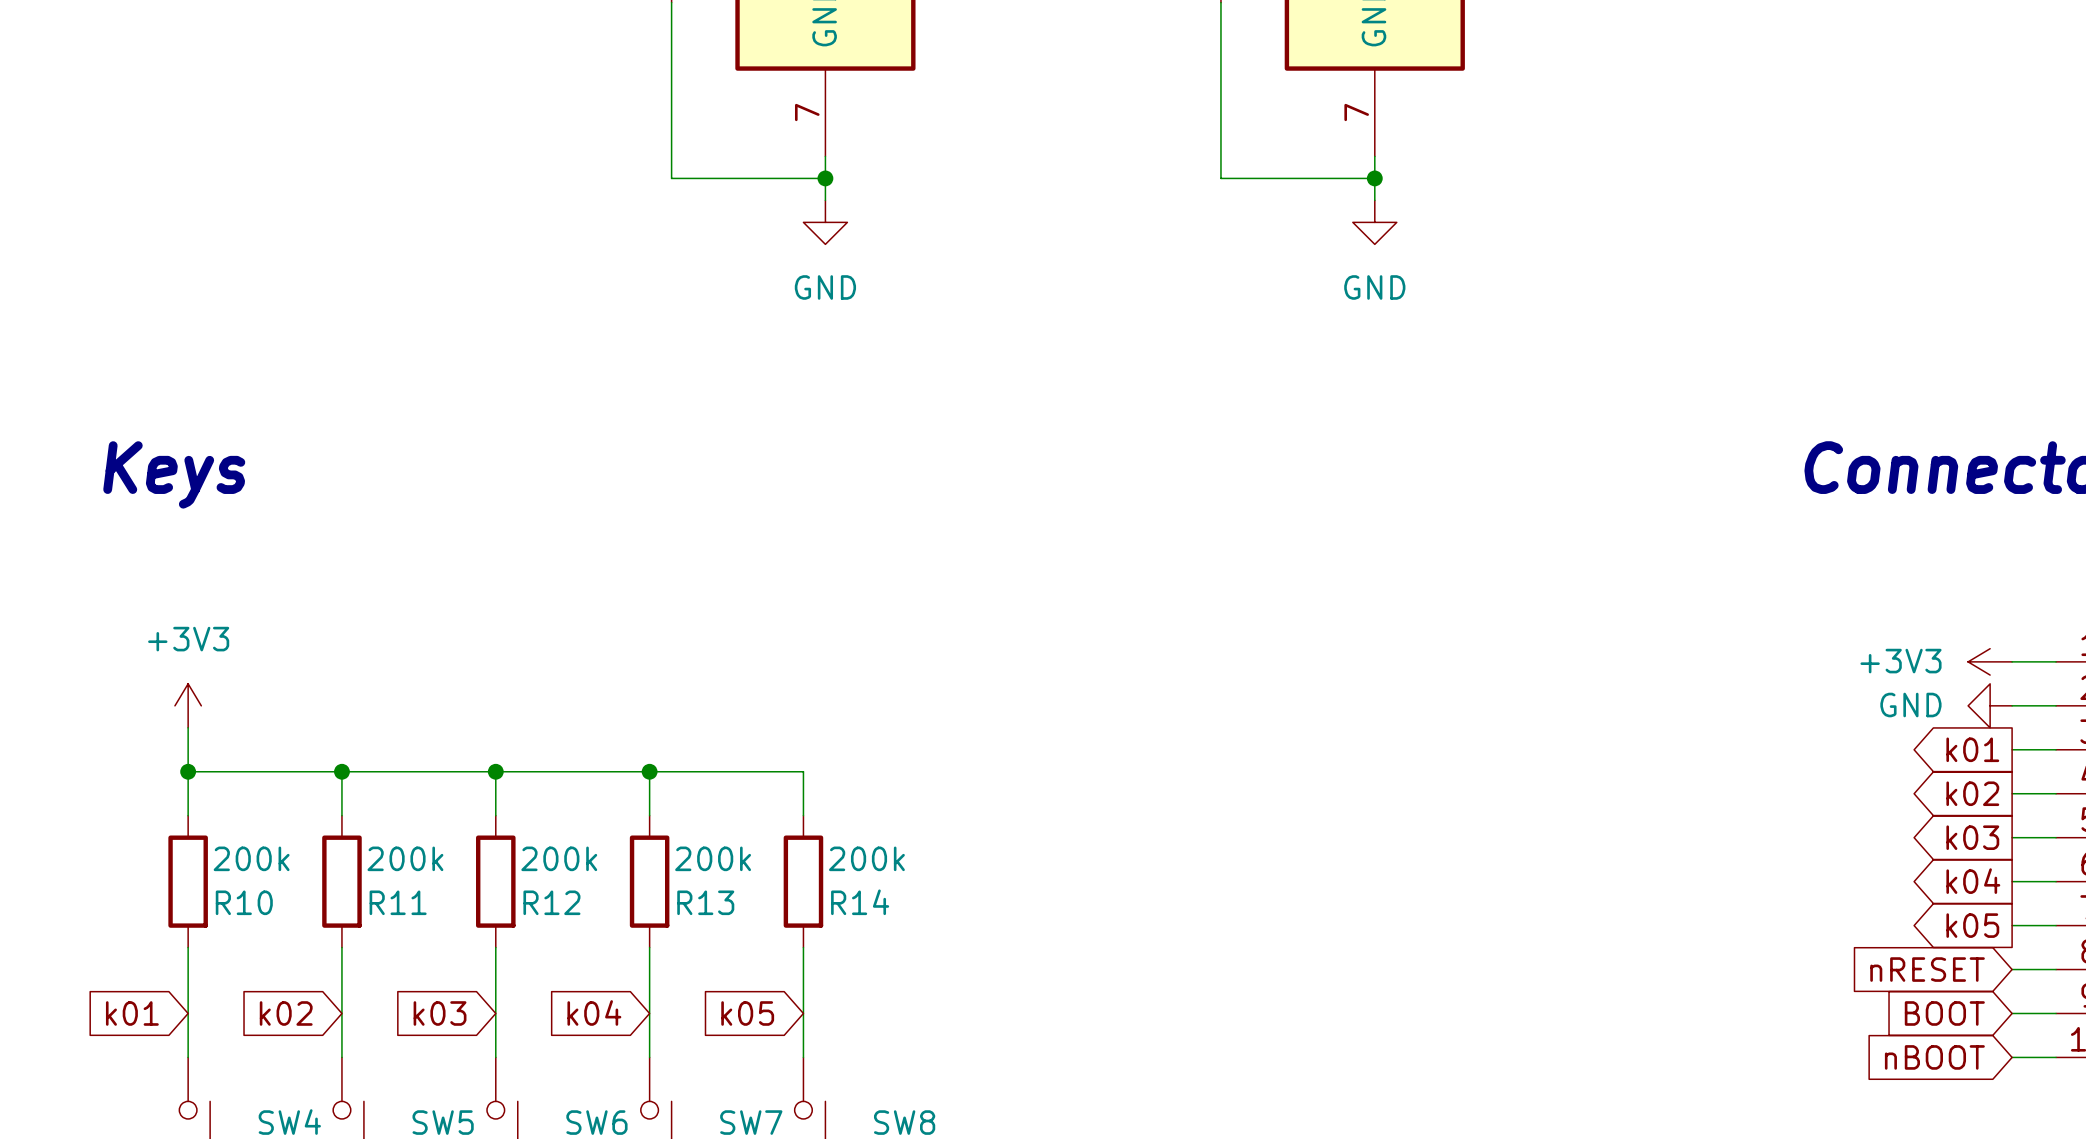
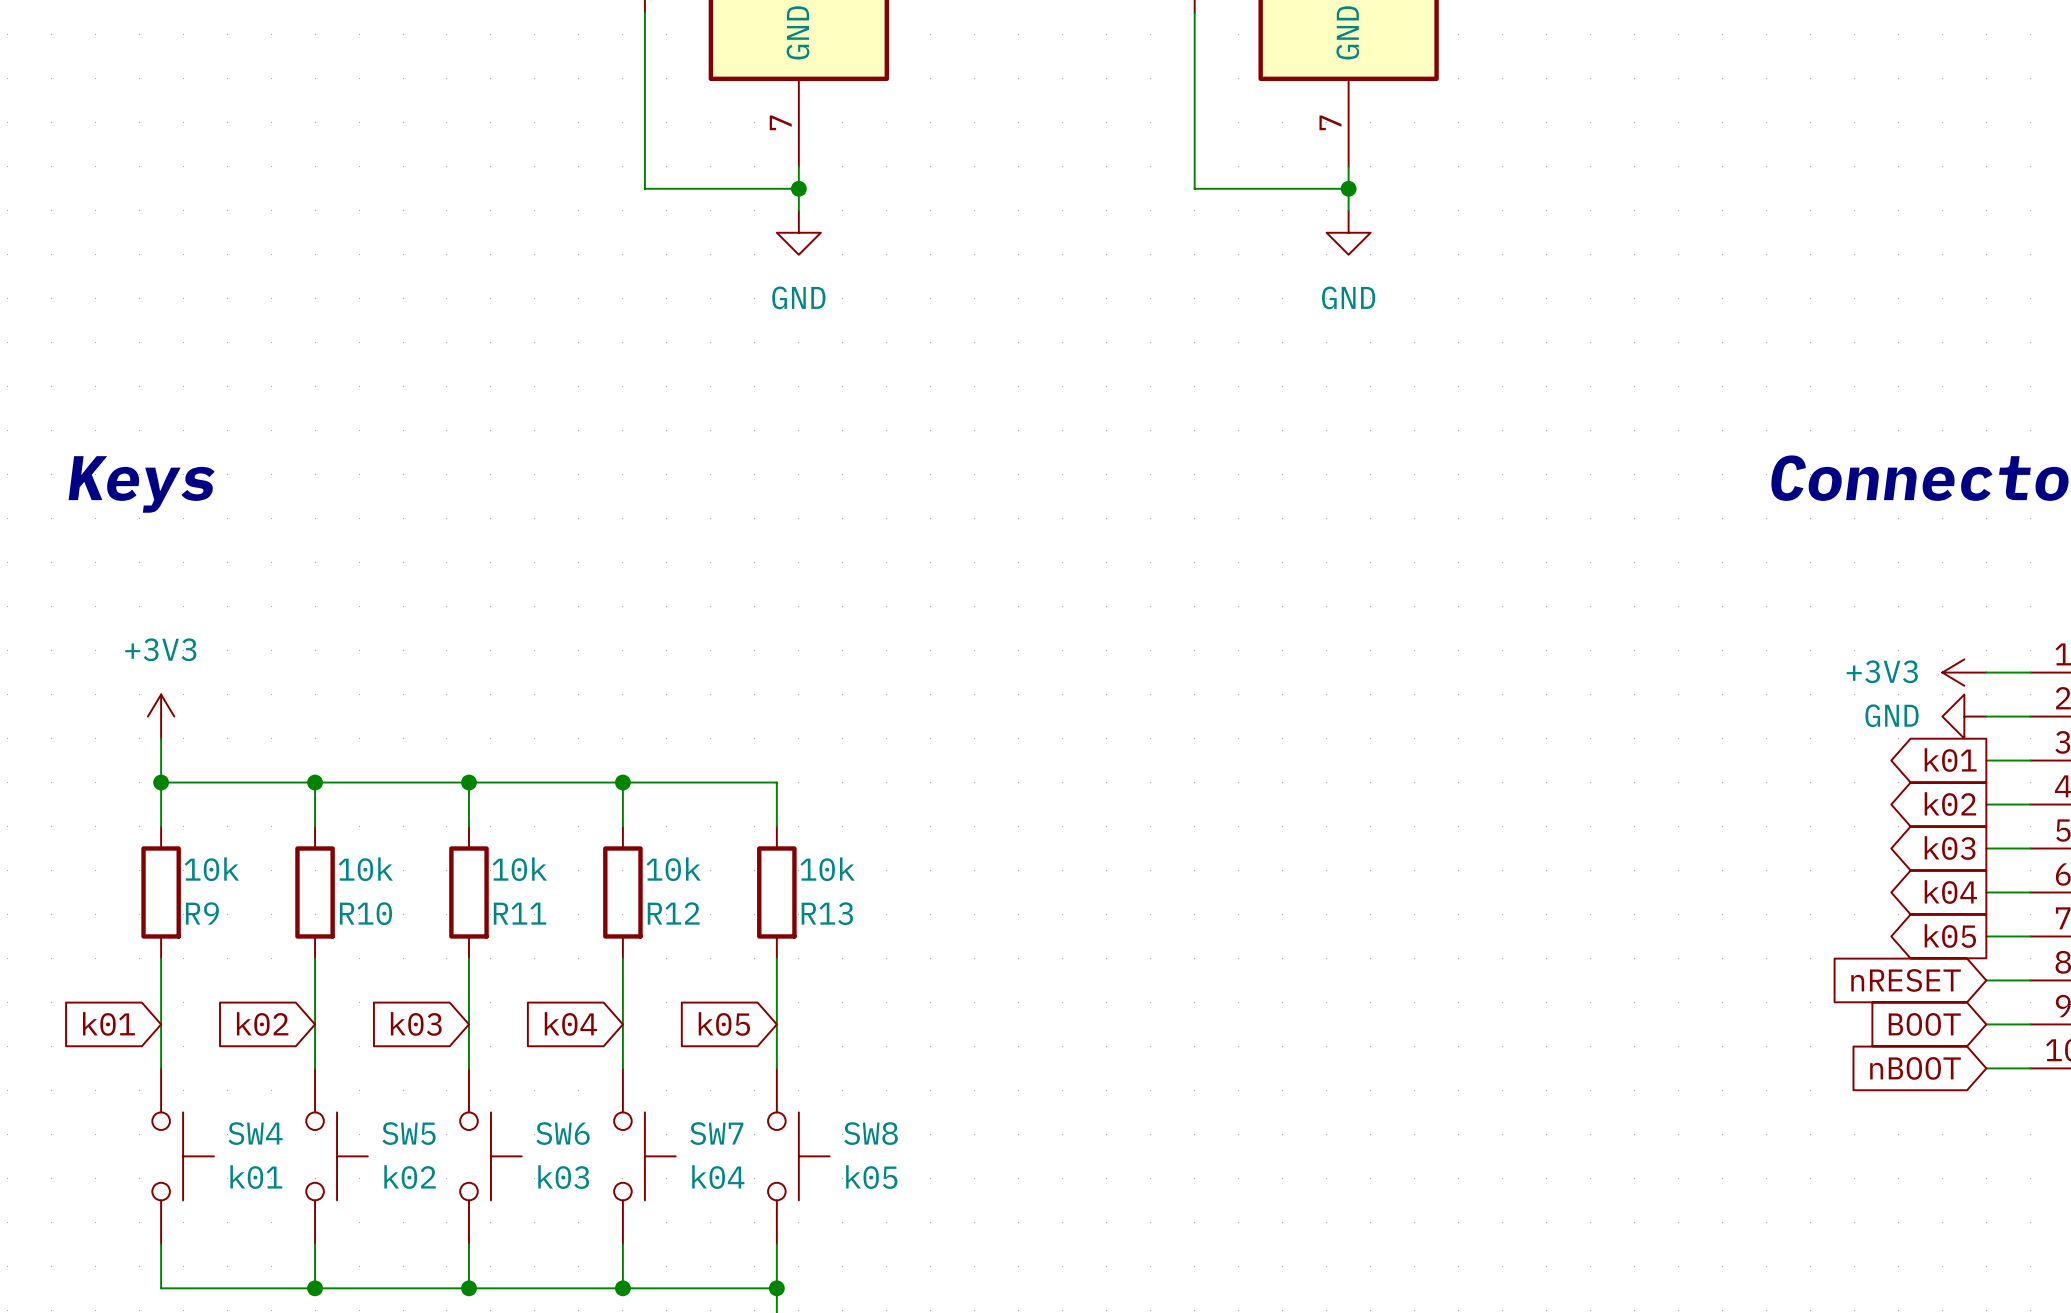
R10 value: 200k (251, 858) -> 10k (211, 869)
R11 value: 200k (405, 858) -> 10k (365, 869)
R12 value: 200k (559, 858) -> 10k (519, 869)
R13 value: 200k (713, 858) -> 10k (673, 869)
R14 value: 200k (866, 858) -> 10k (827, 869)
R10 name: R10 (244, 902) -> R9 (202, 913)
R11 name: R11 (398, 902) -> R10 (365, 913)
R12 name: R12 (551, 902) -> R11 (520, 913)
R13 name: R13 (705, 902) -> R12 (673, 913)
R14 name: R14 (860, 902) -> R13 (827, 913)

